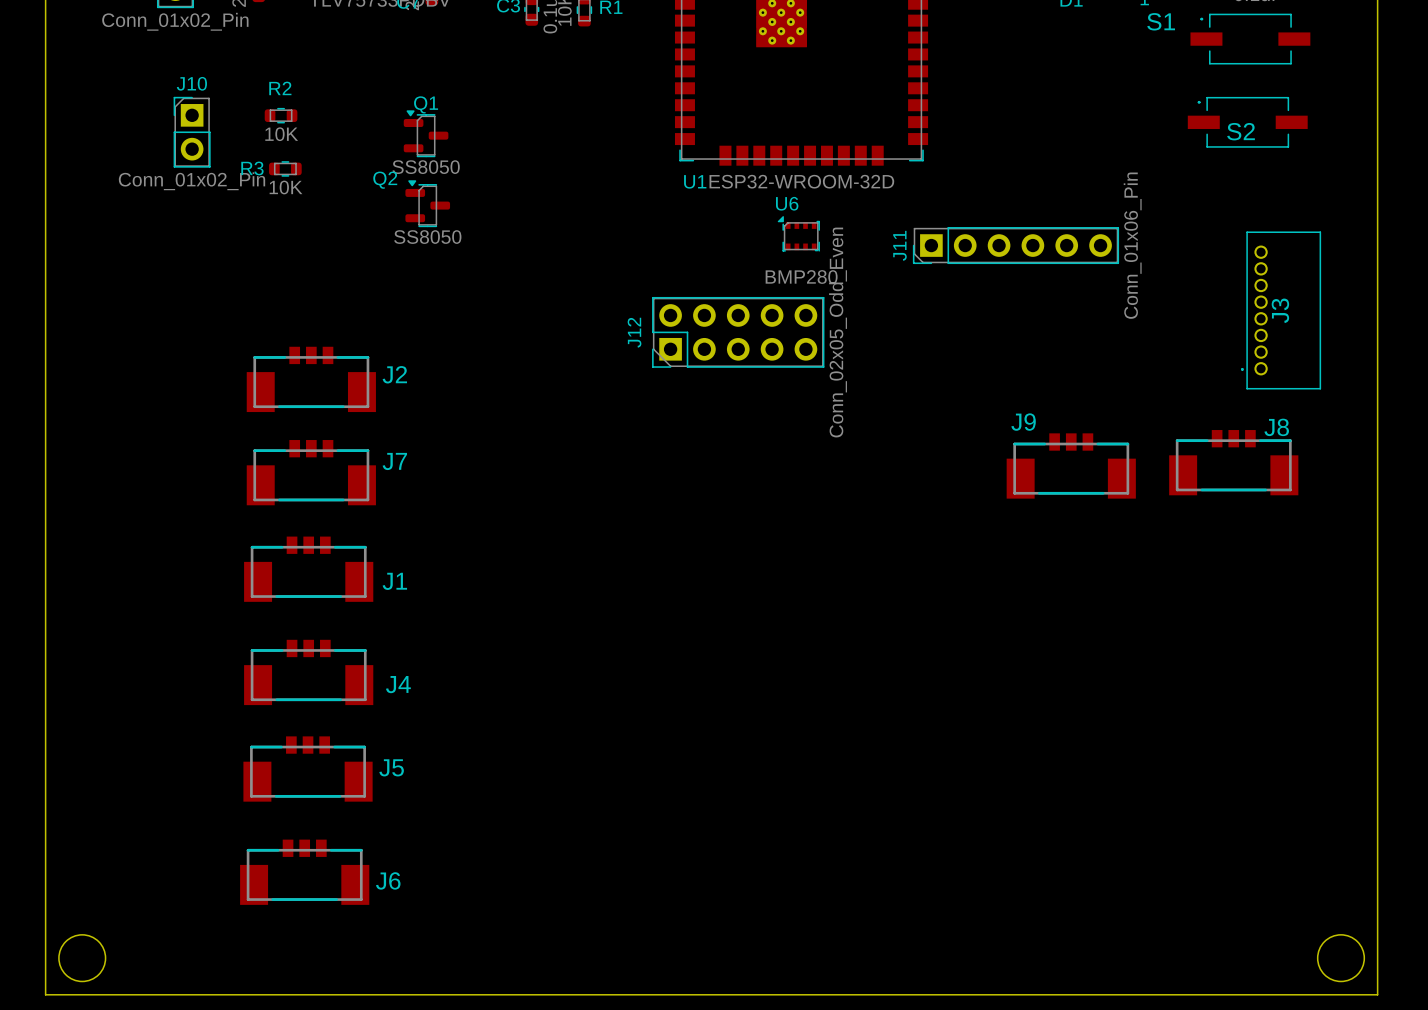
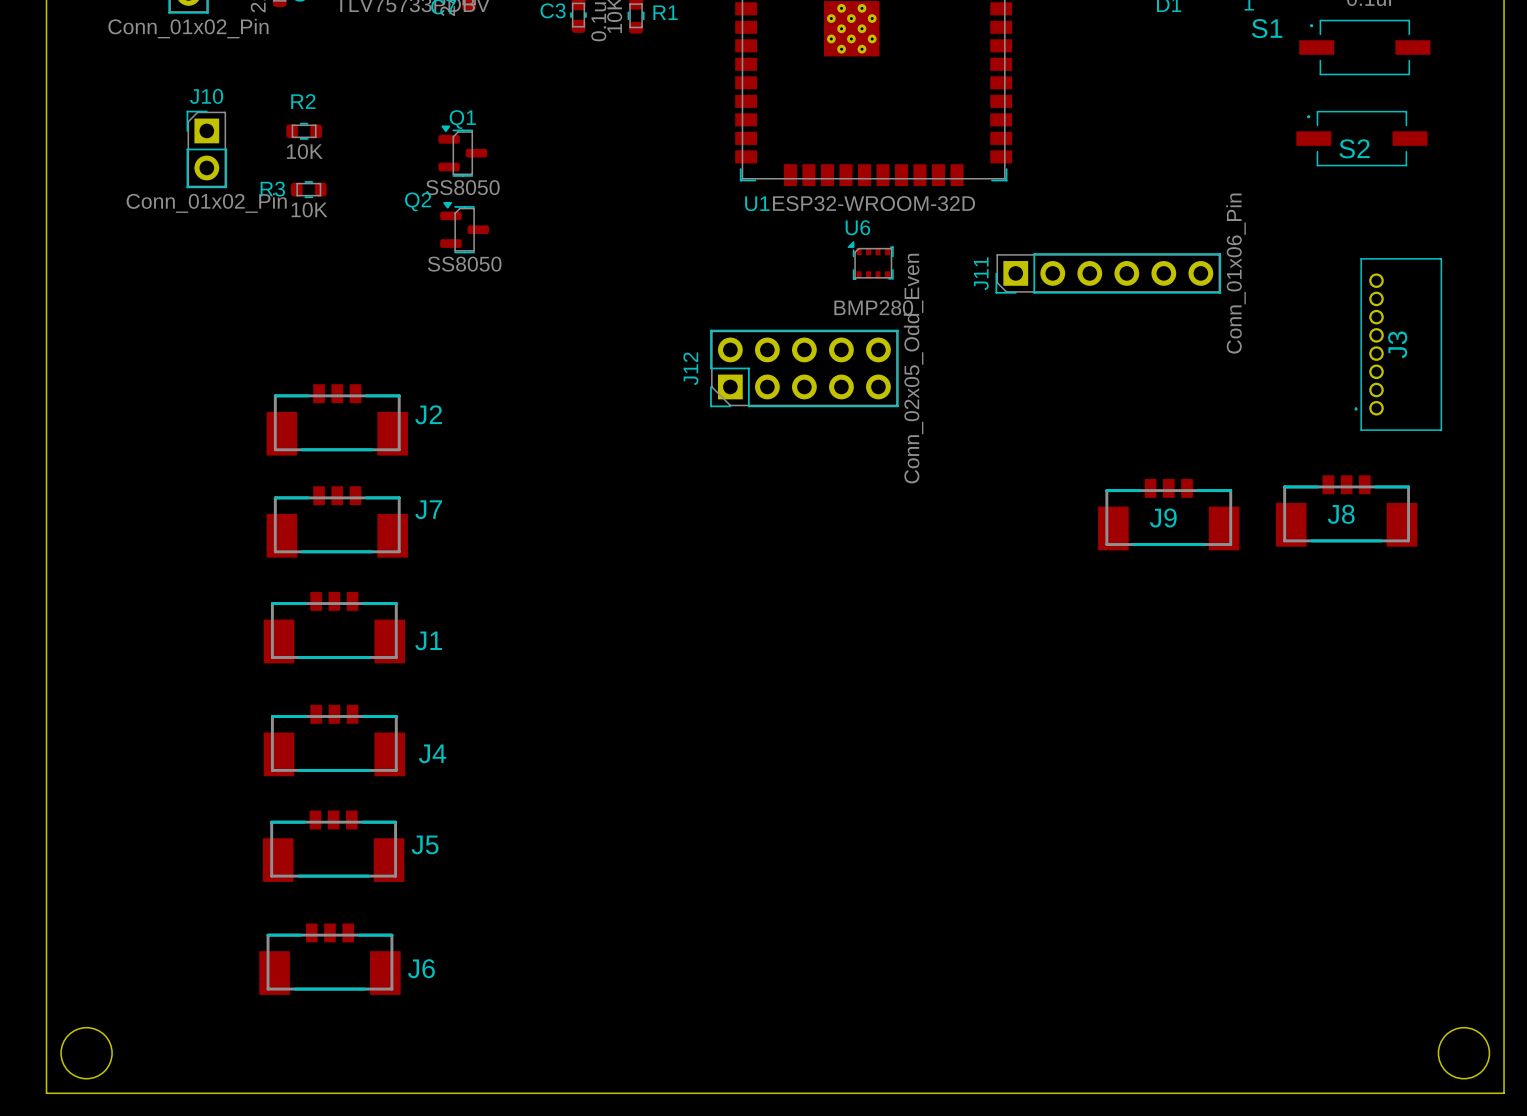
J9 name position: J9 (1023, 422) -> J9 (1163, 517)
J8 name position: J8 (1276, 427) -> J8 (1341, 514)

